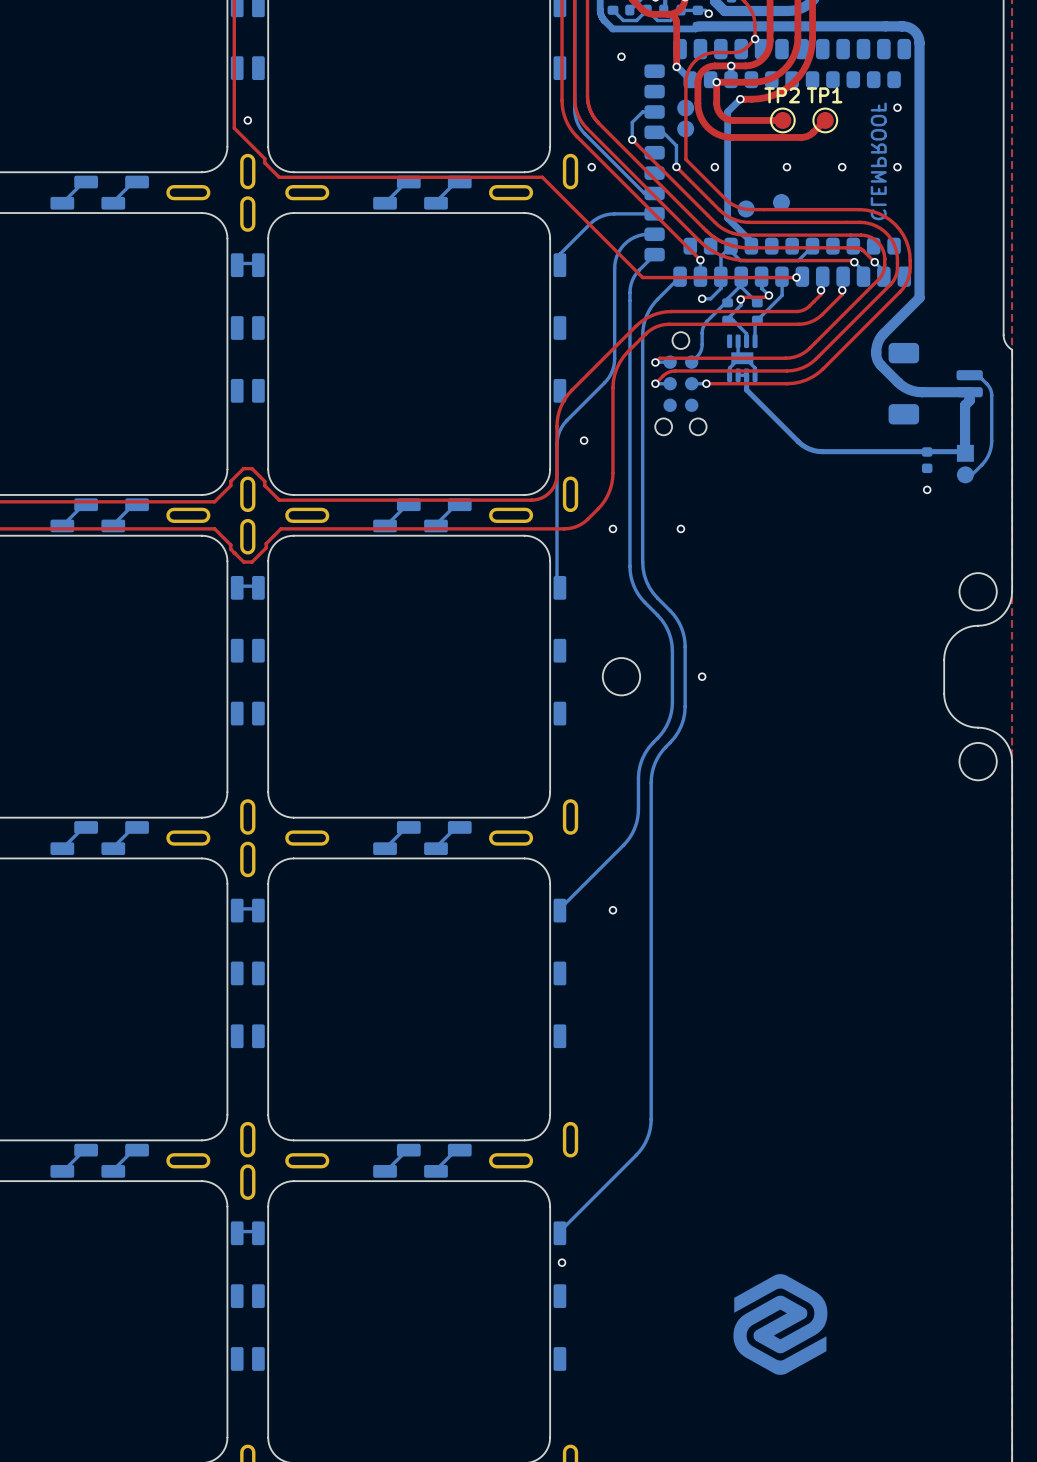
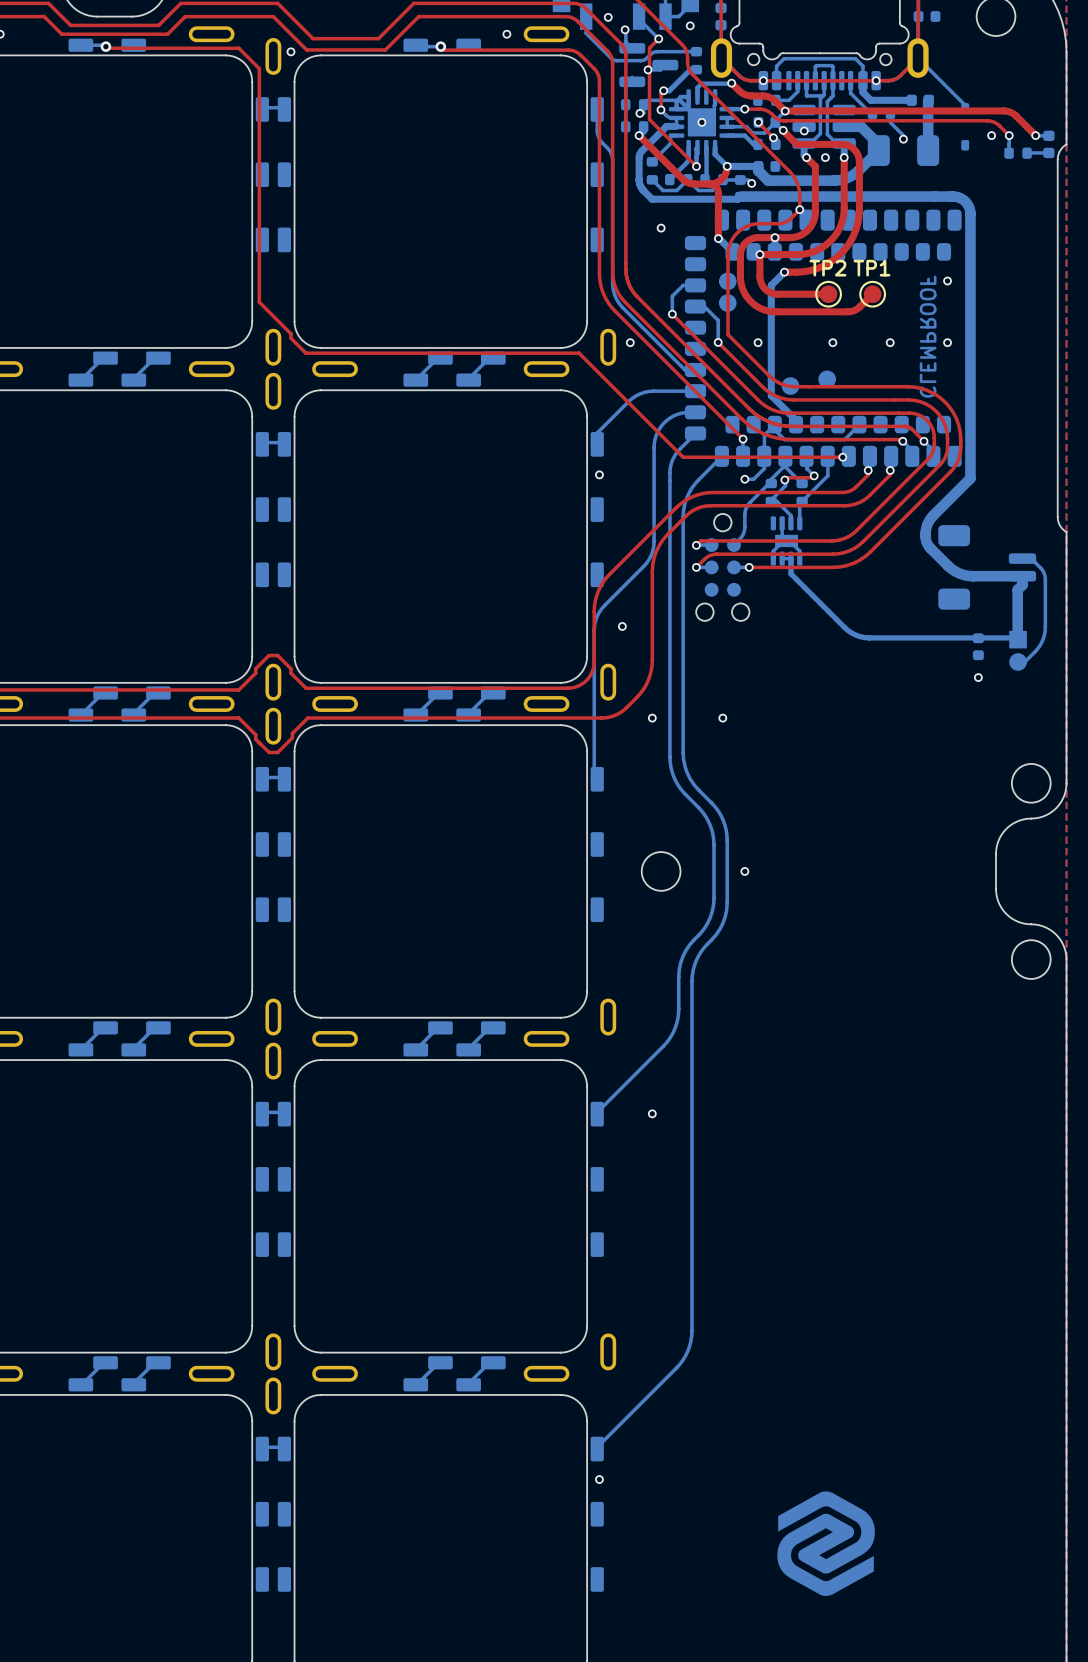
via: (247, 120) -> none
via: none -> (599, 474)

